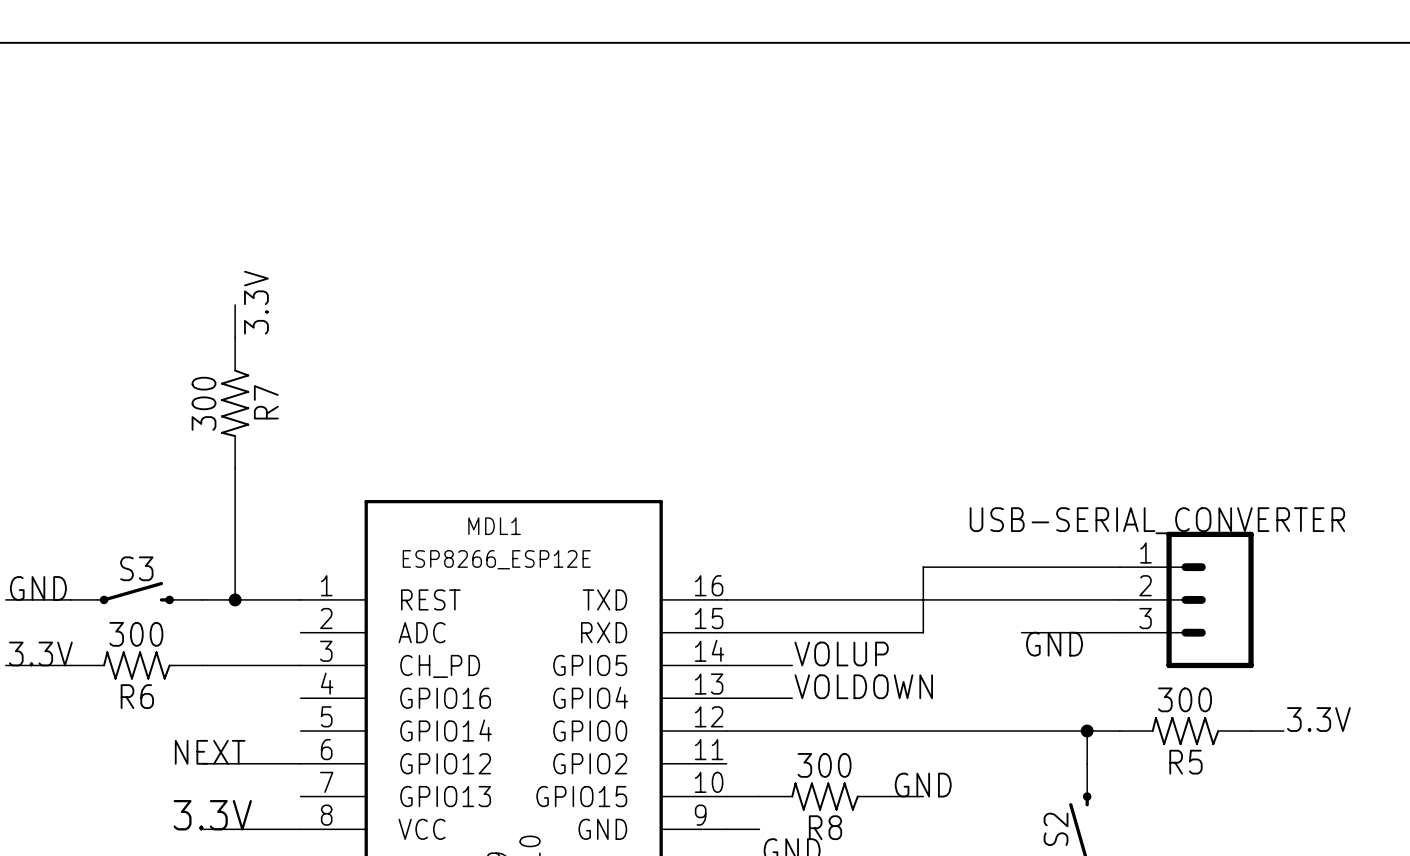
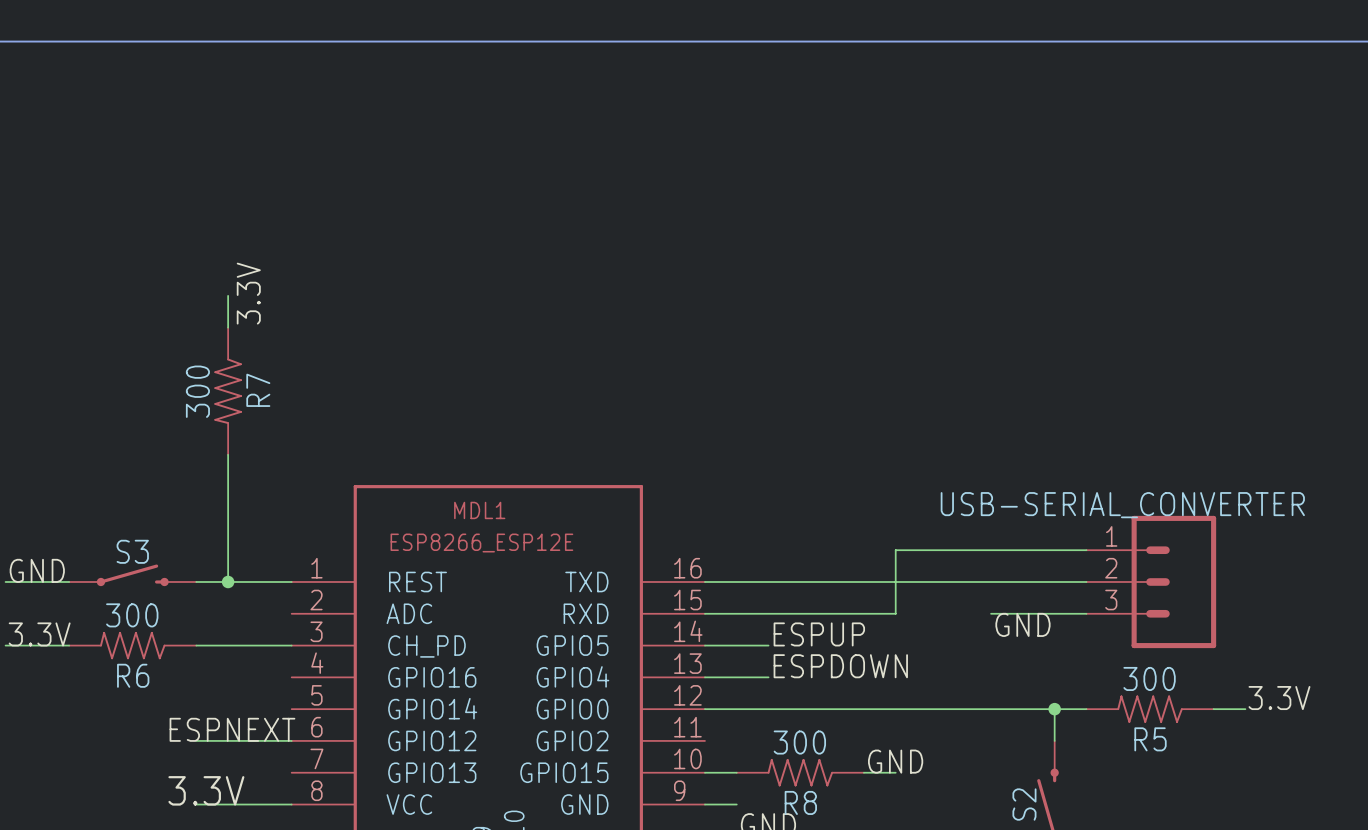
label: VOLUP (841, 654) -> ESPUP (819, 634)
label: VOLDOWN (863, 686) -> ESPDOWN (840, 666)
label: NEXT (210, 752) -> ESPNEXT (232, 729)

